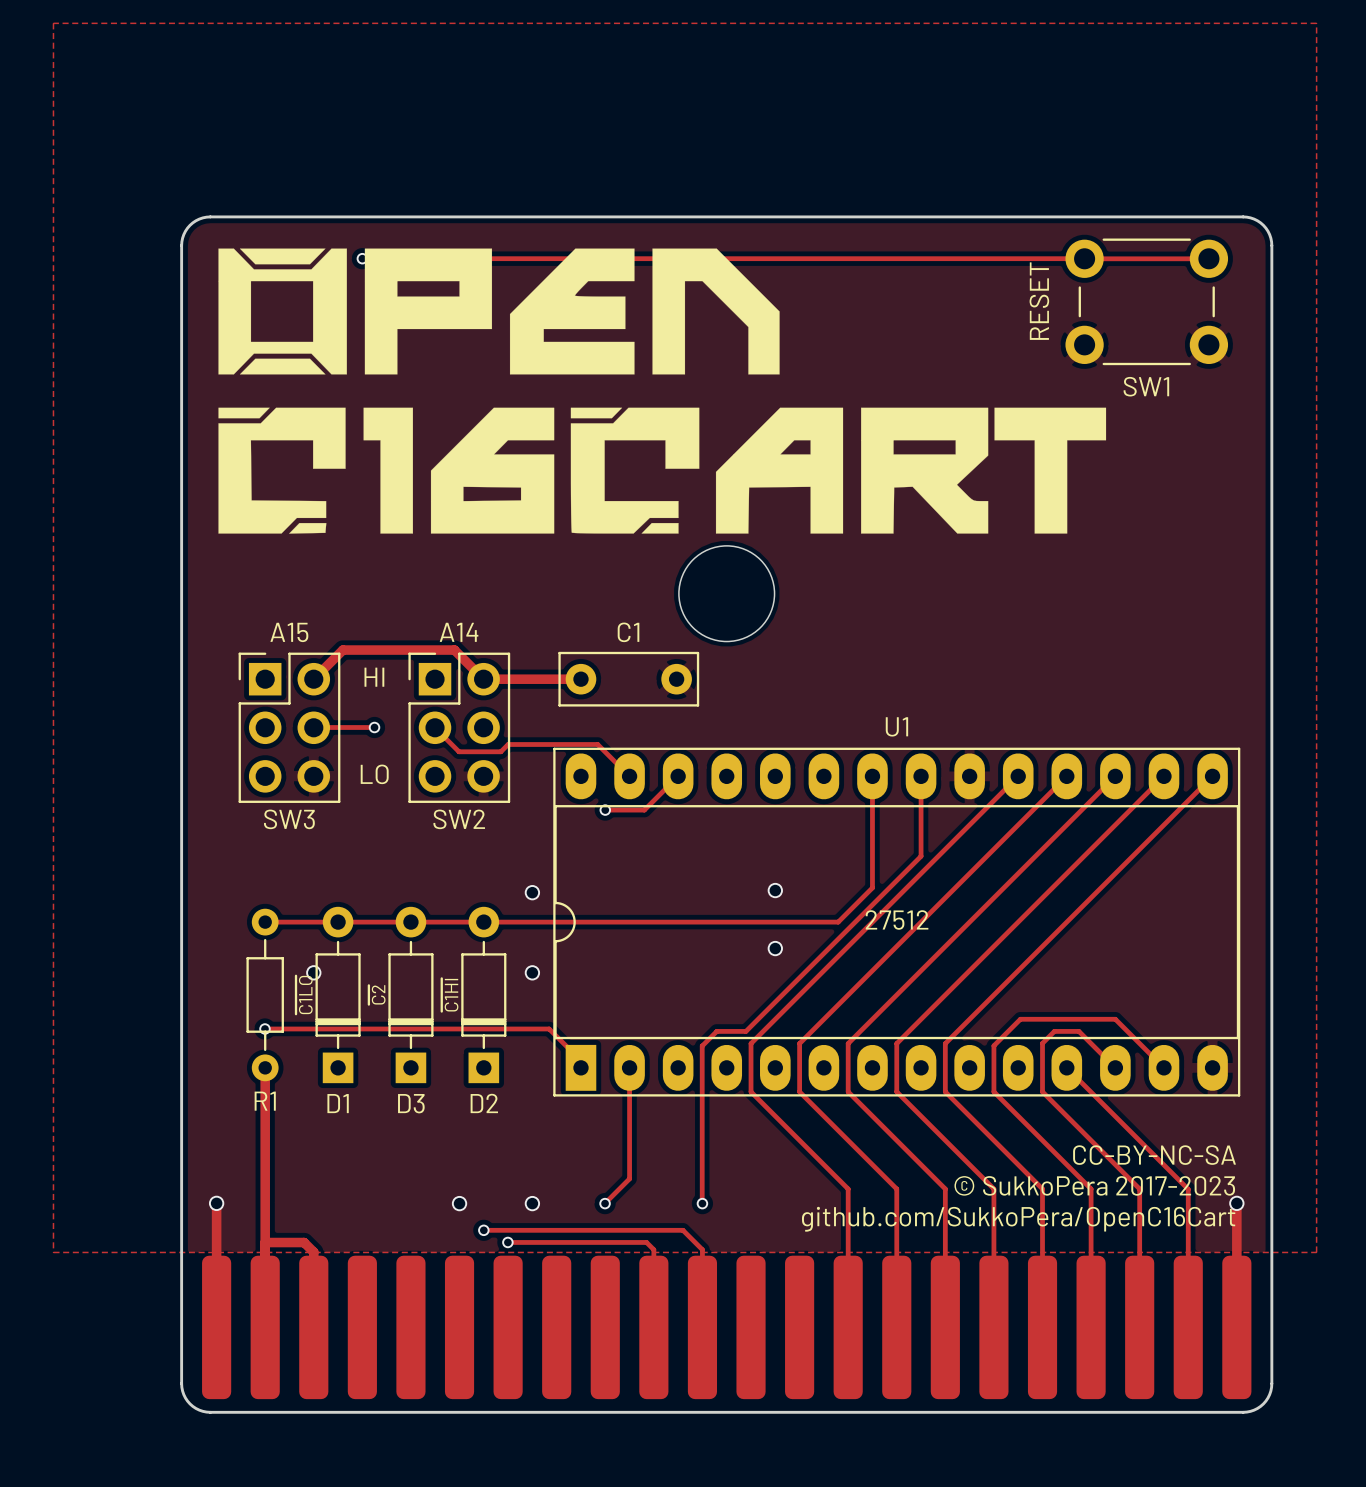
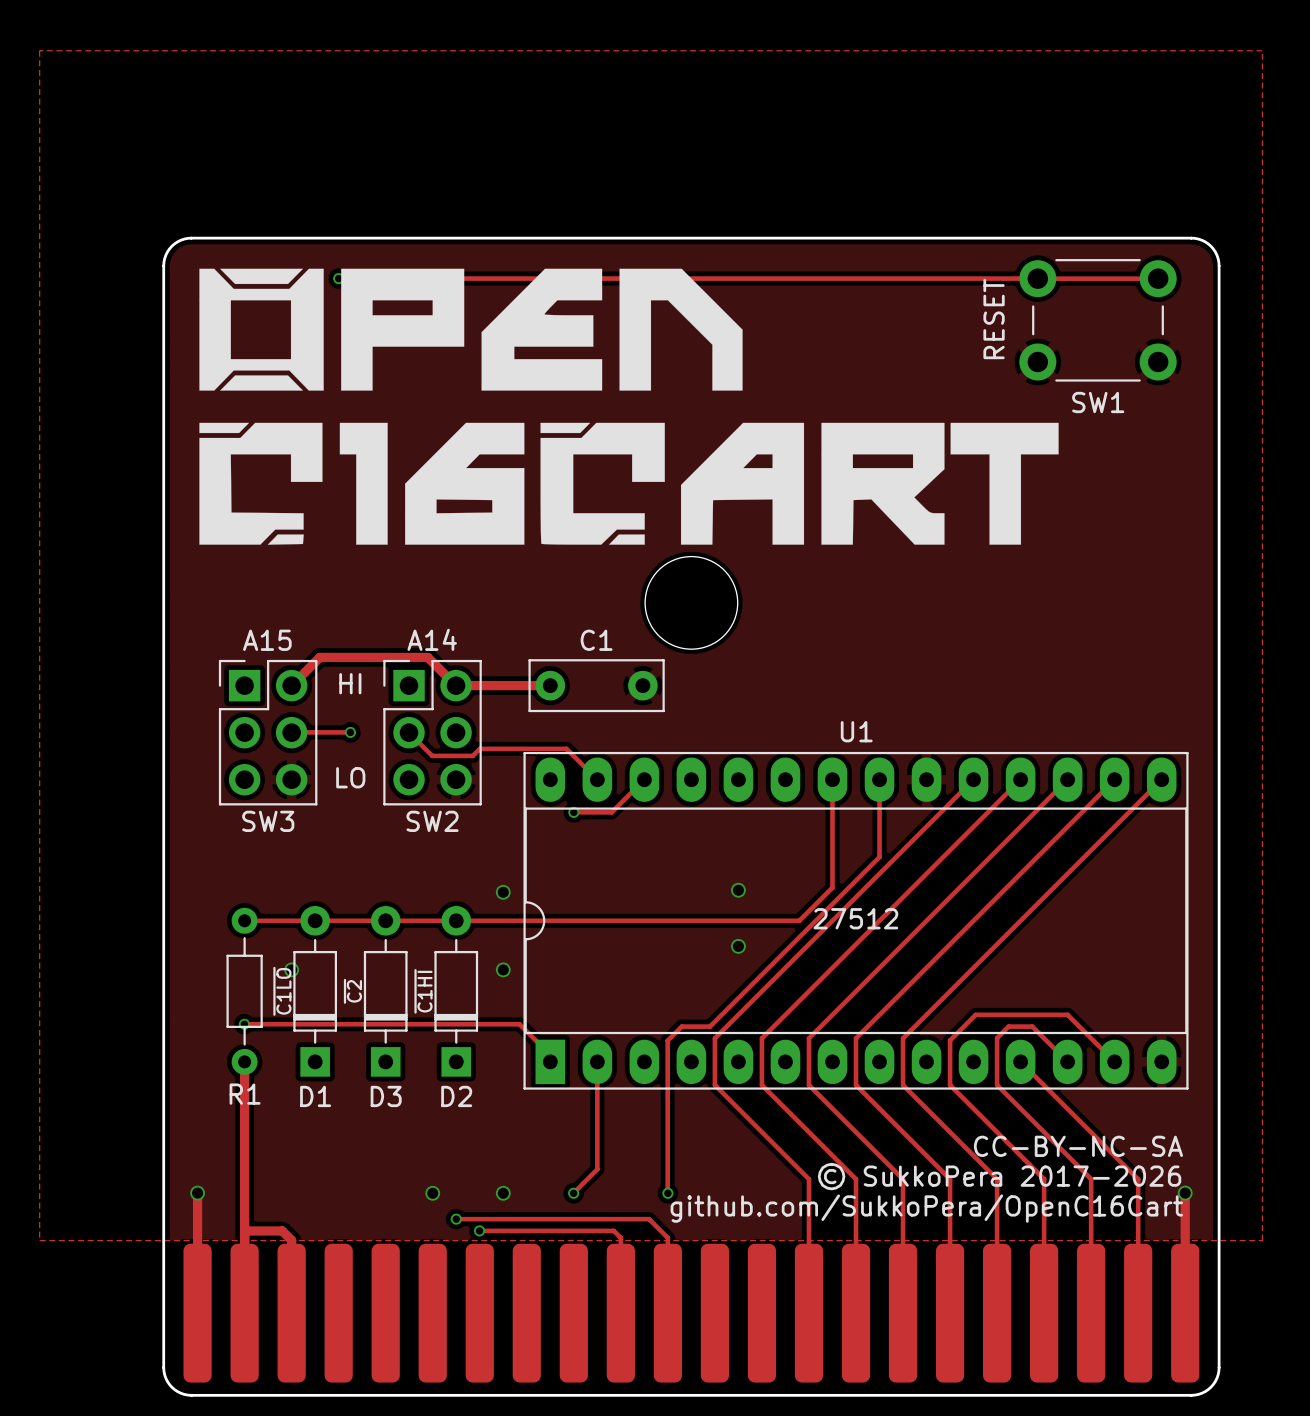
text: © SukkoPera 2017-2023 (1094, 1185) -> © SukkoPera 2017-2026 (999, 1176)

